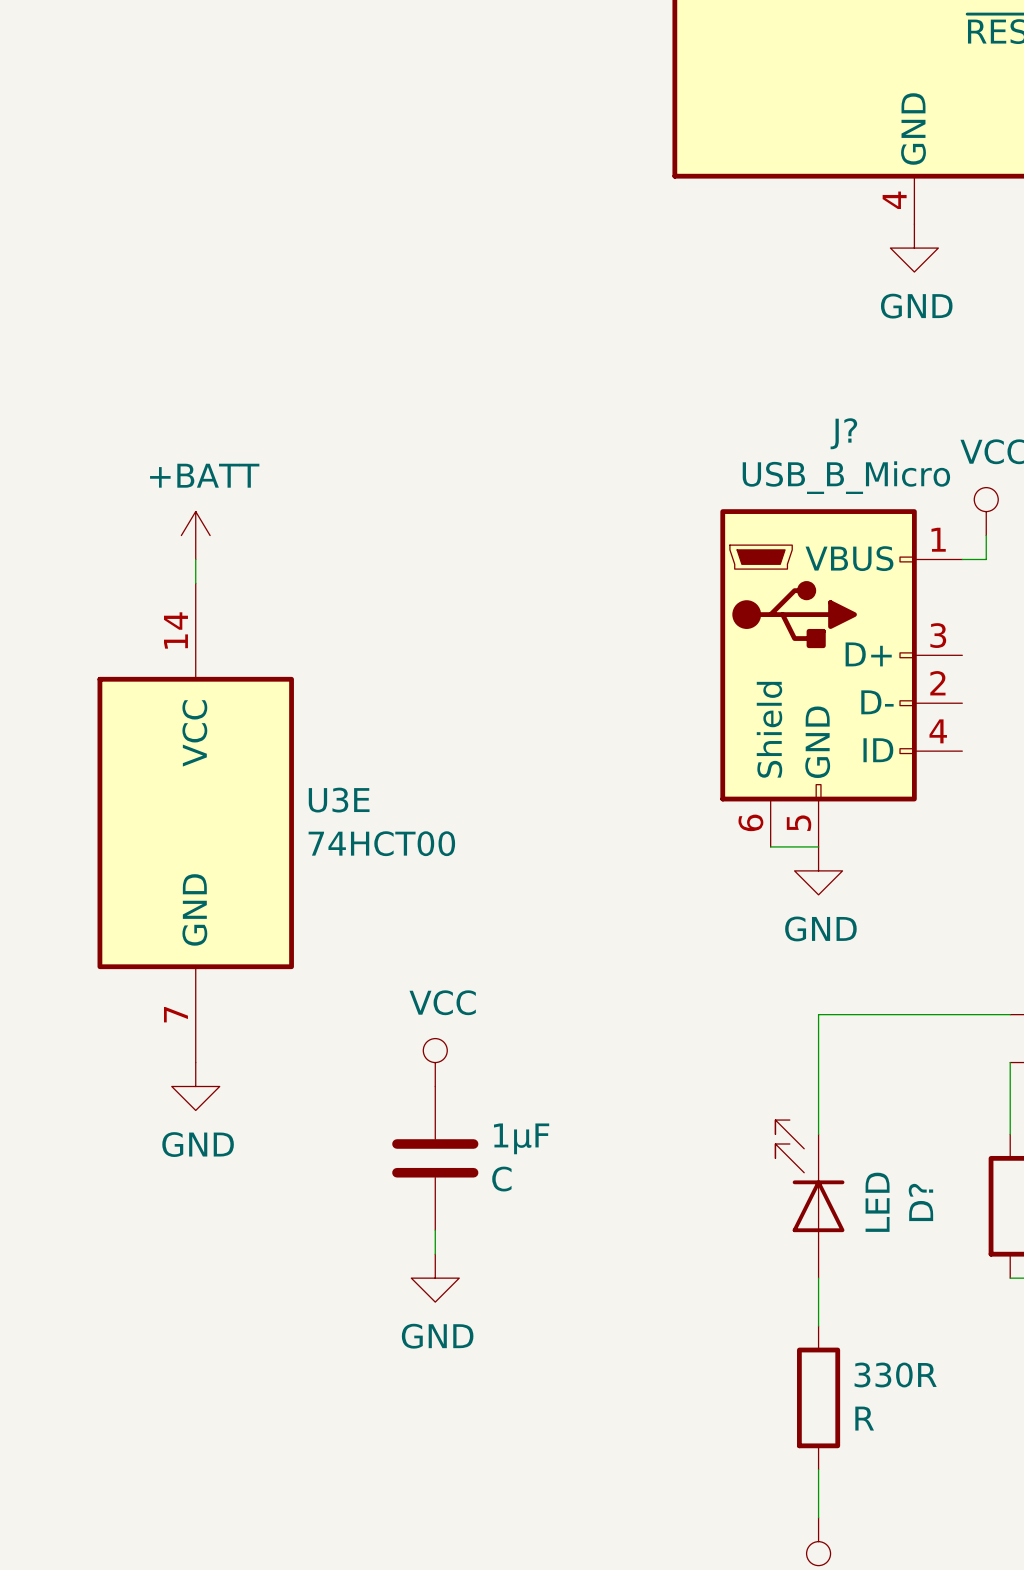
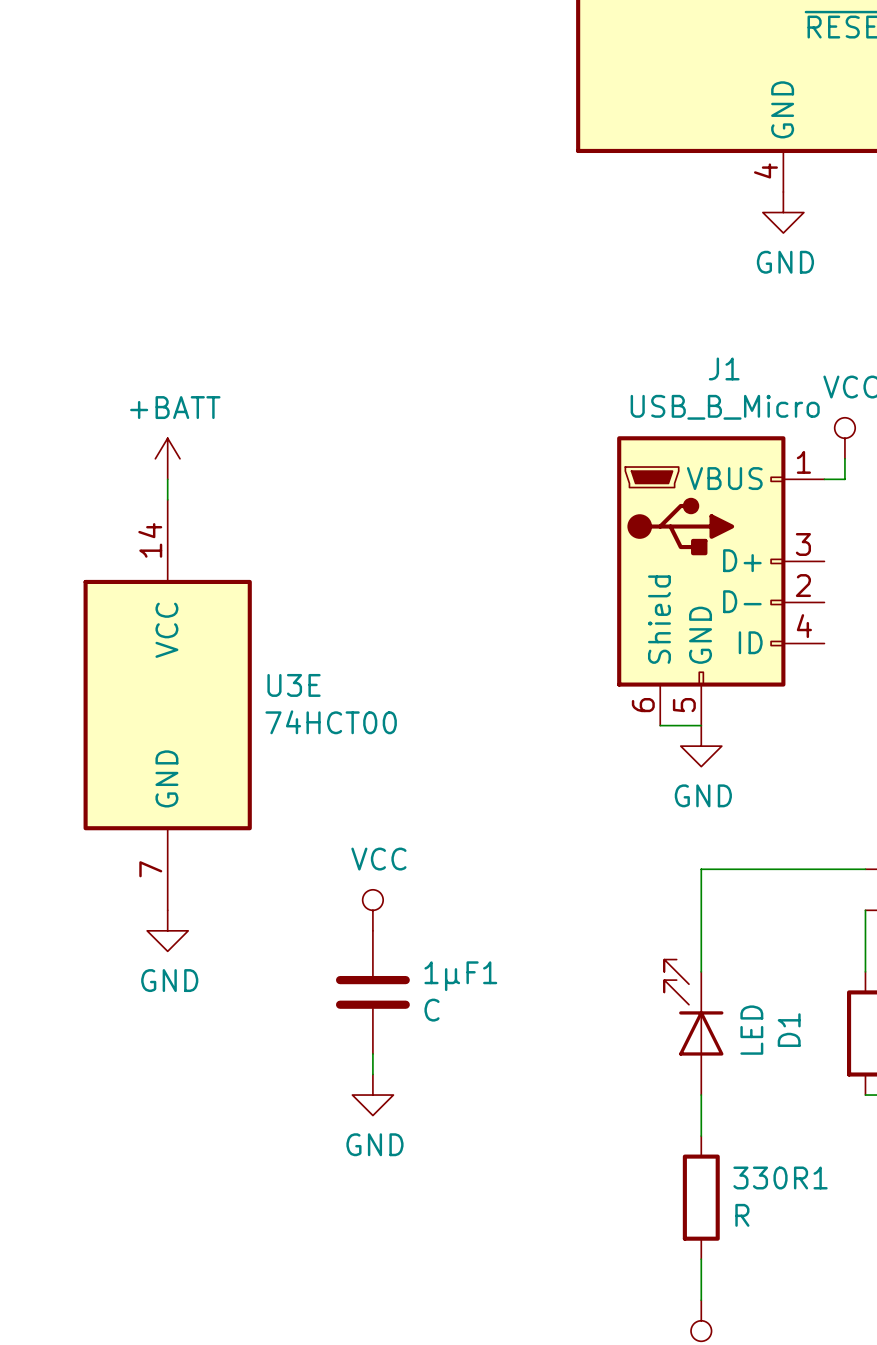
J? name: J? (843, 433) -> J1 (724, 368)
1µF name: 1µF (521, 1138) -> 1µF1 (460, 976)
D? name: D? (920, 1202) -> D1 (789, 1030)
330R name: 330R (895, 1375) -> 330R1 (780, 1177)

